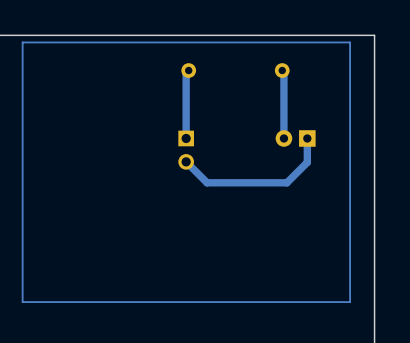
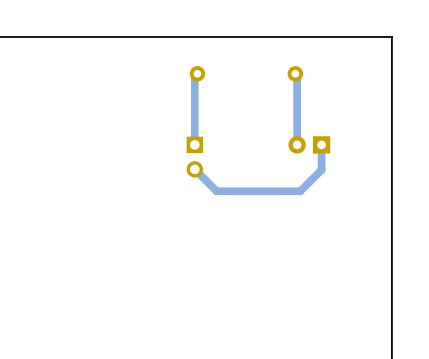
track: (350, 42) (22, 42) (22, 302) (350, 302) (350, 42) -> none

